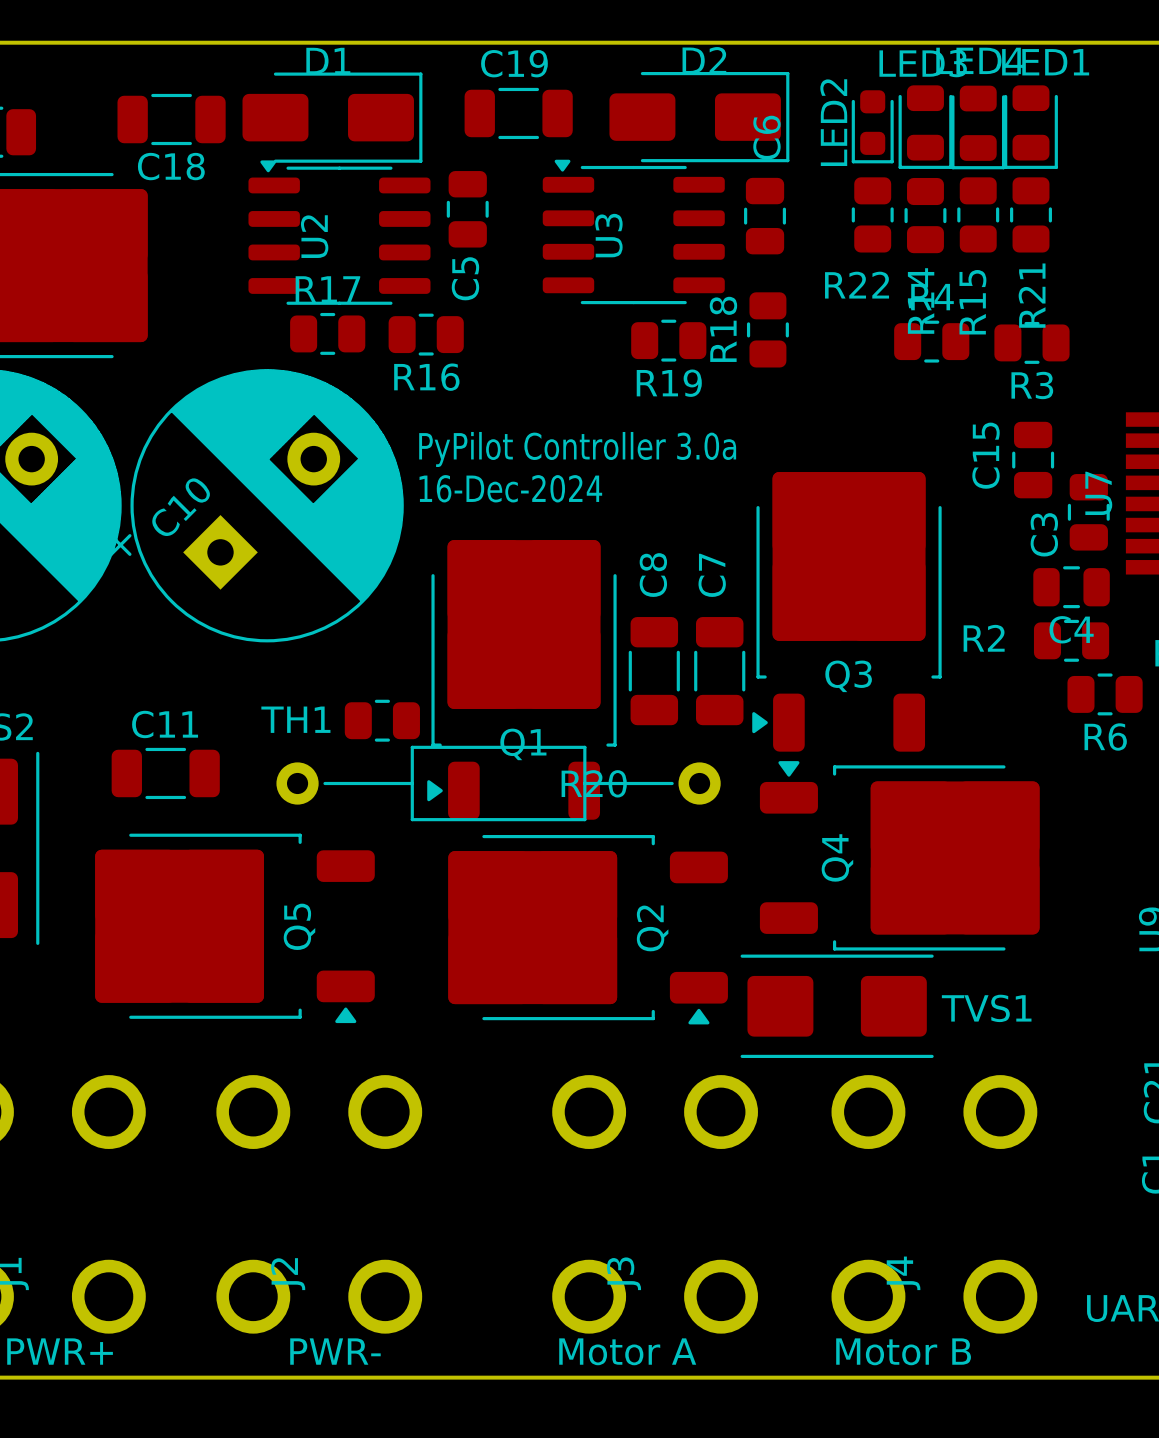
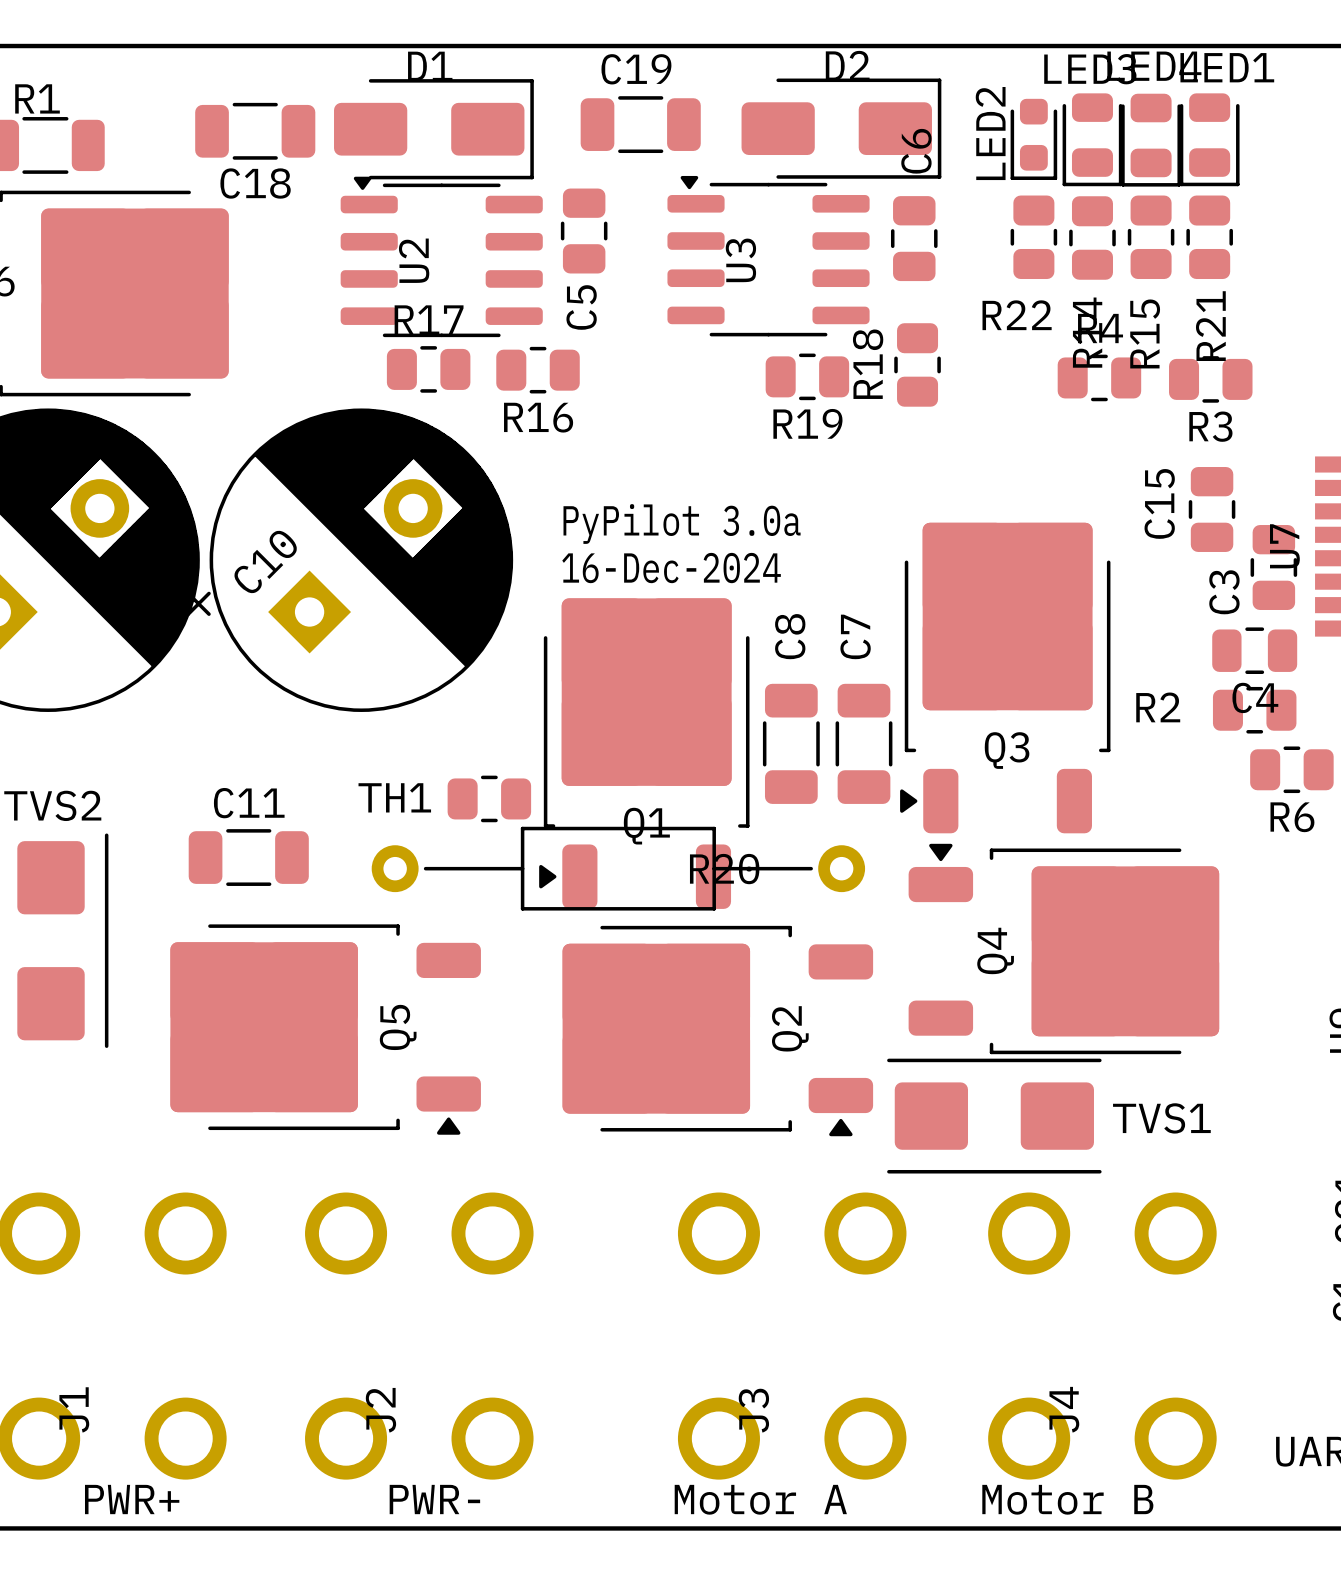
text: PyPilot Controller 3.0a (577, 449) -> PyPilot 3.0a (682, 524)
text position: 16-Dec-2024 (510, 488) -> 16-Dec-2024 (671, 568)

